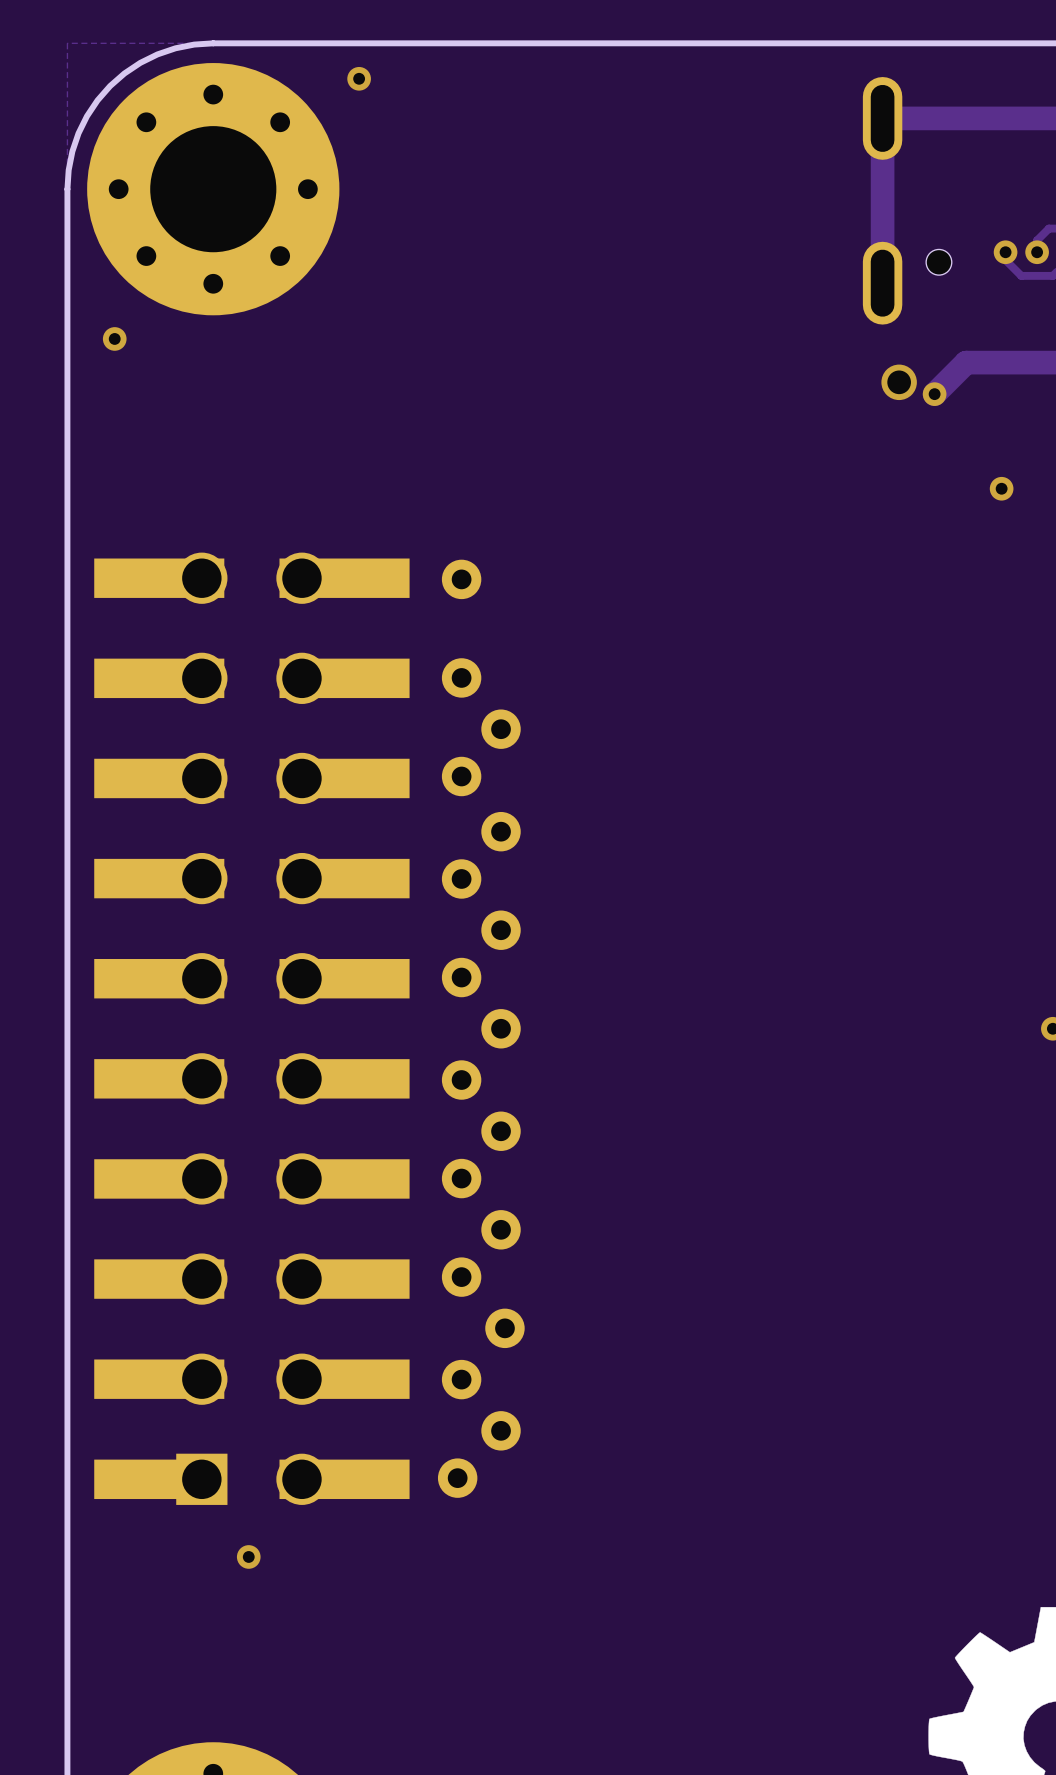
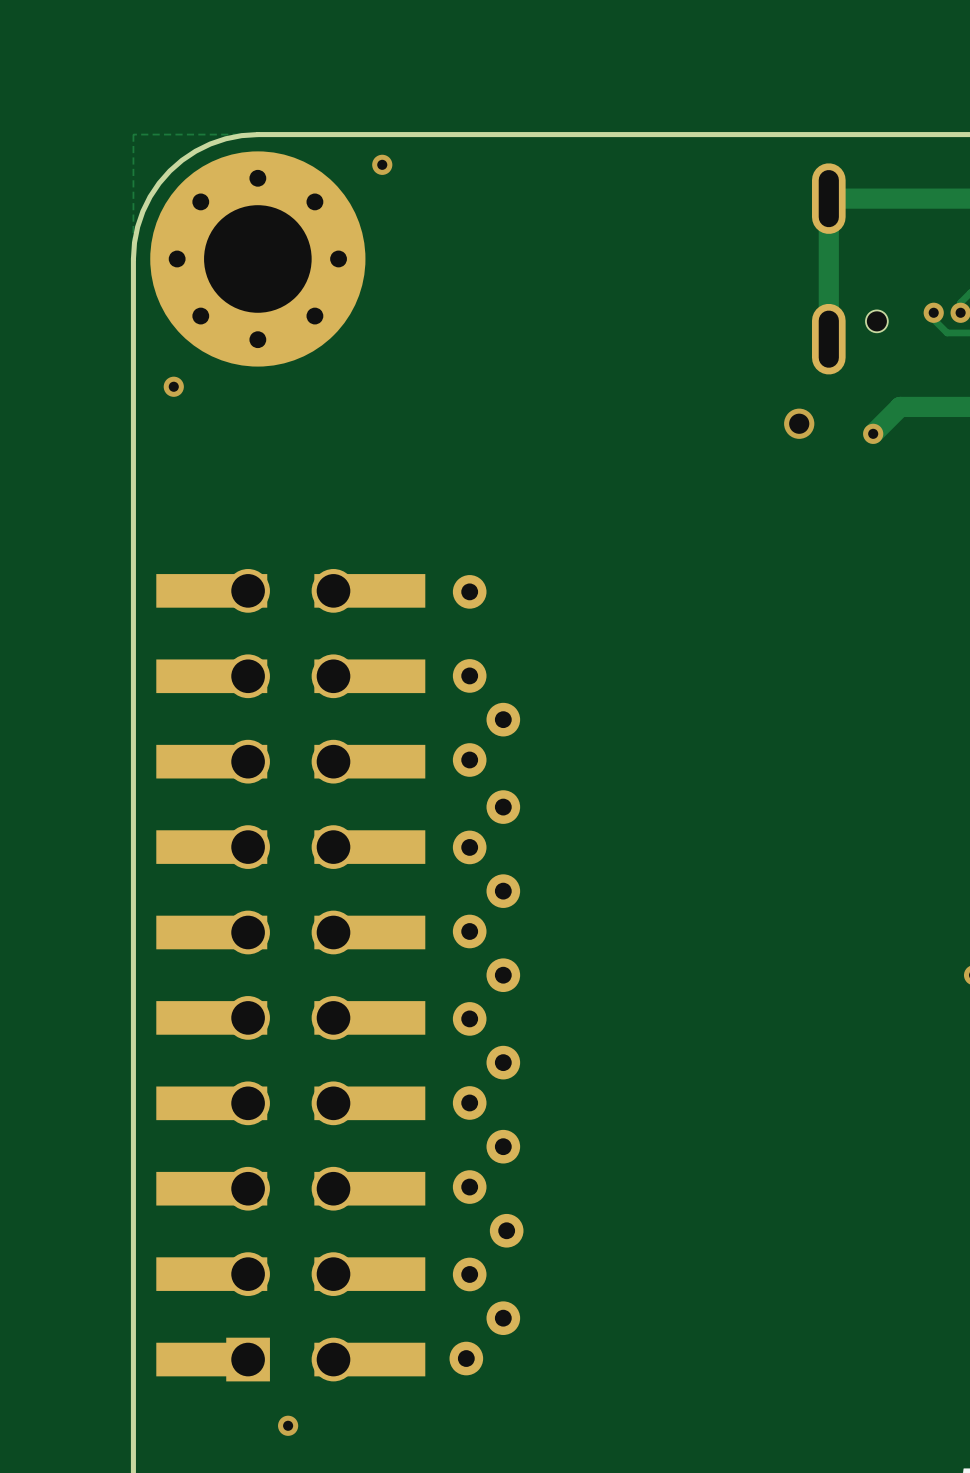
via position: (899, 382) -> (799, 423)
via: (1001, 488) -> none

